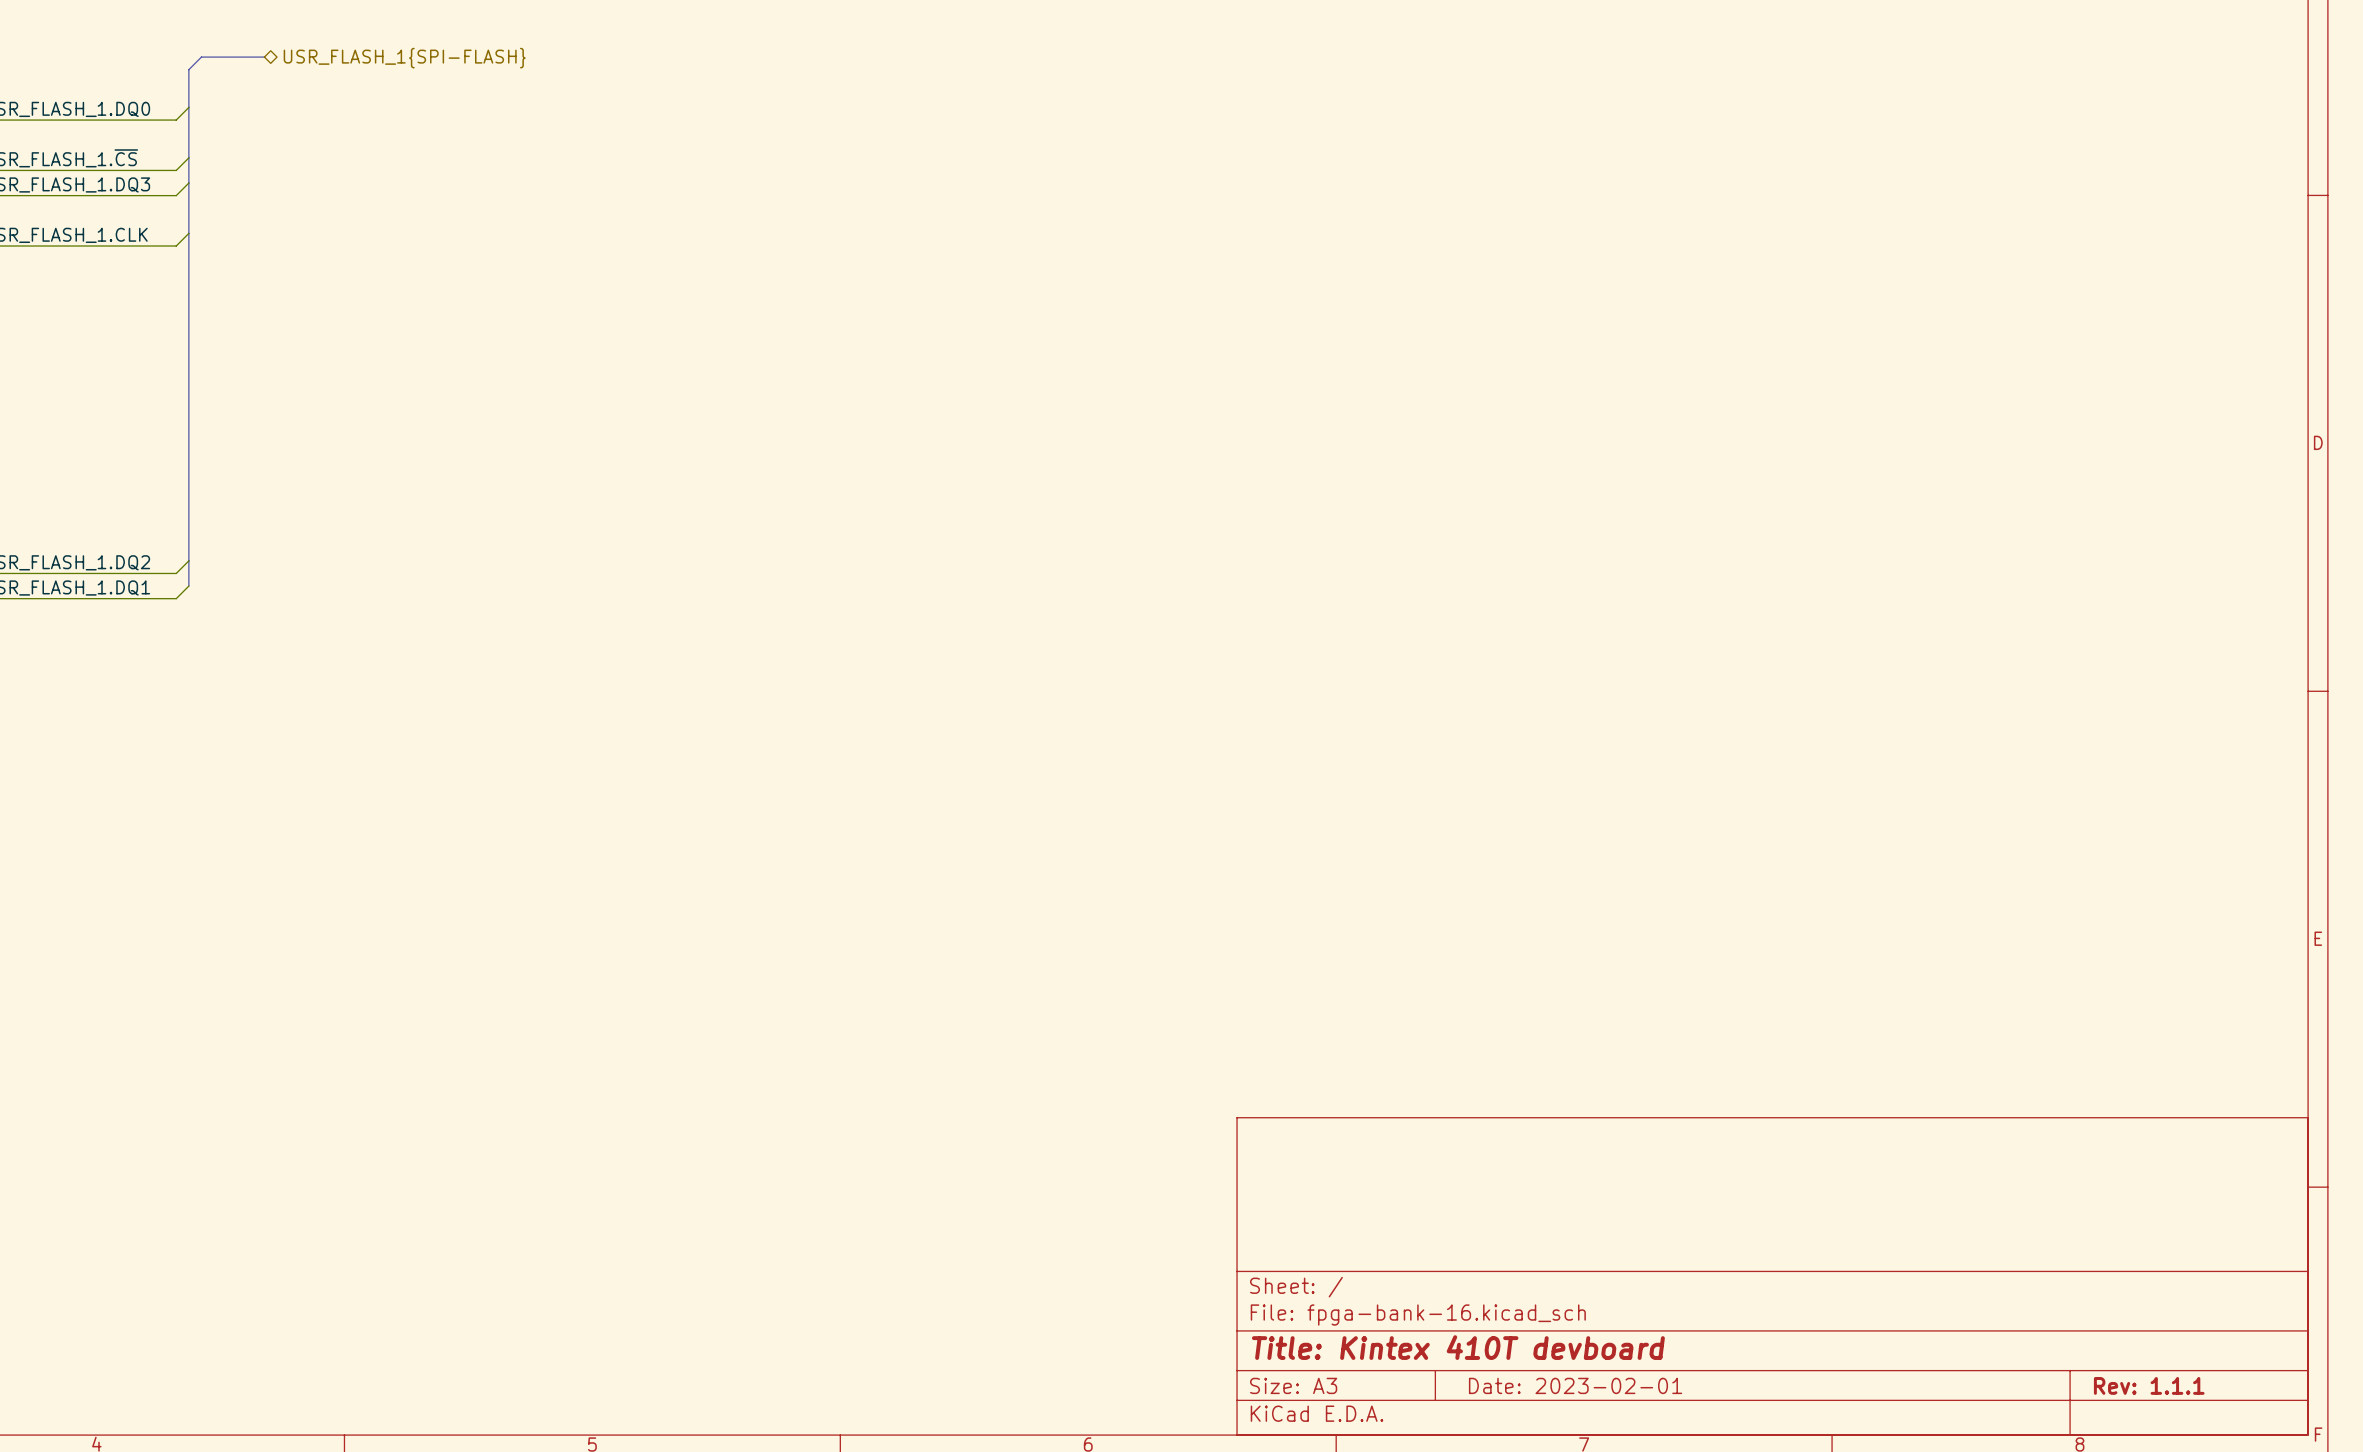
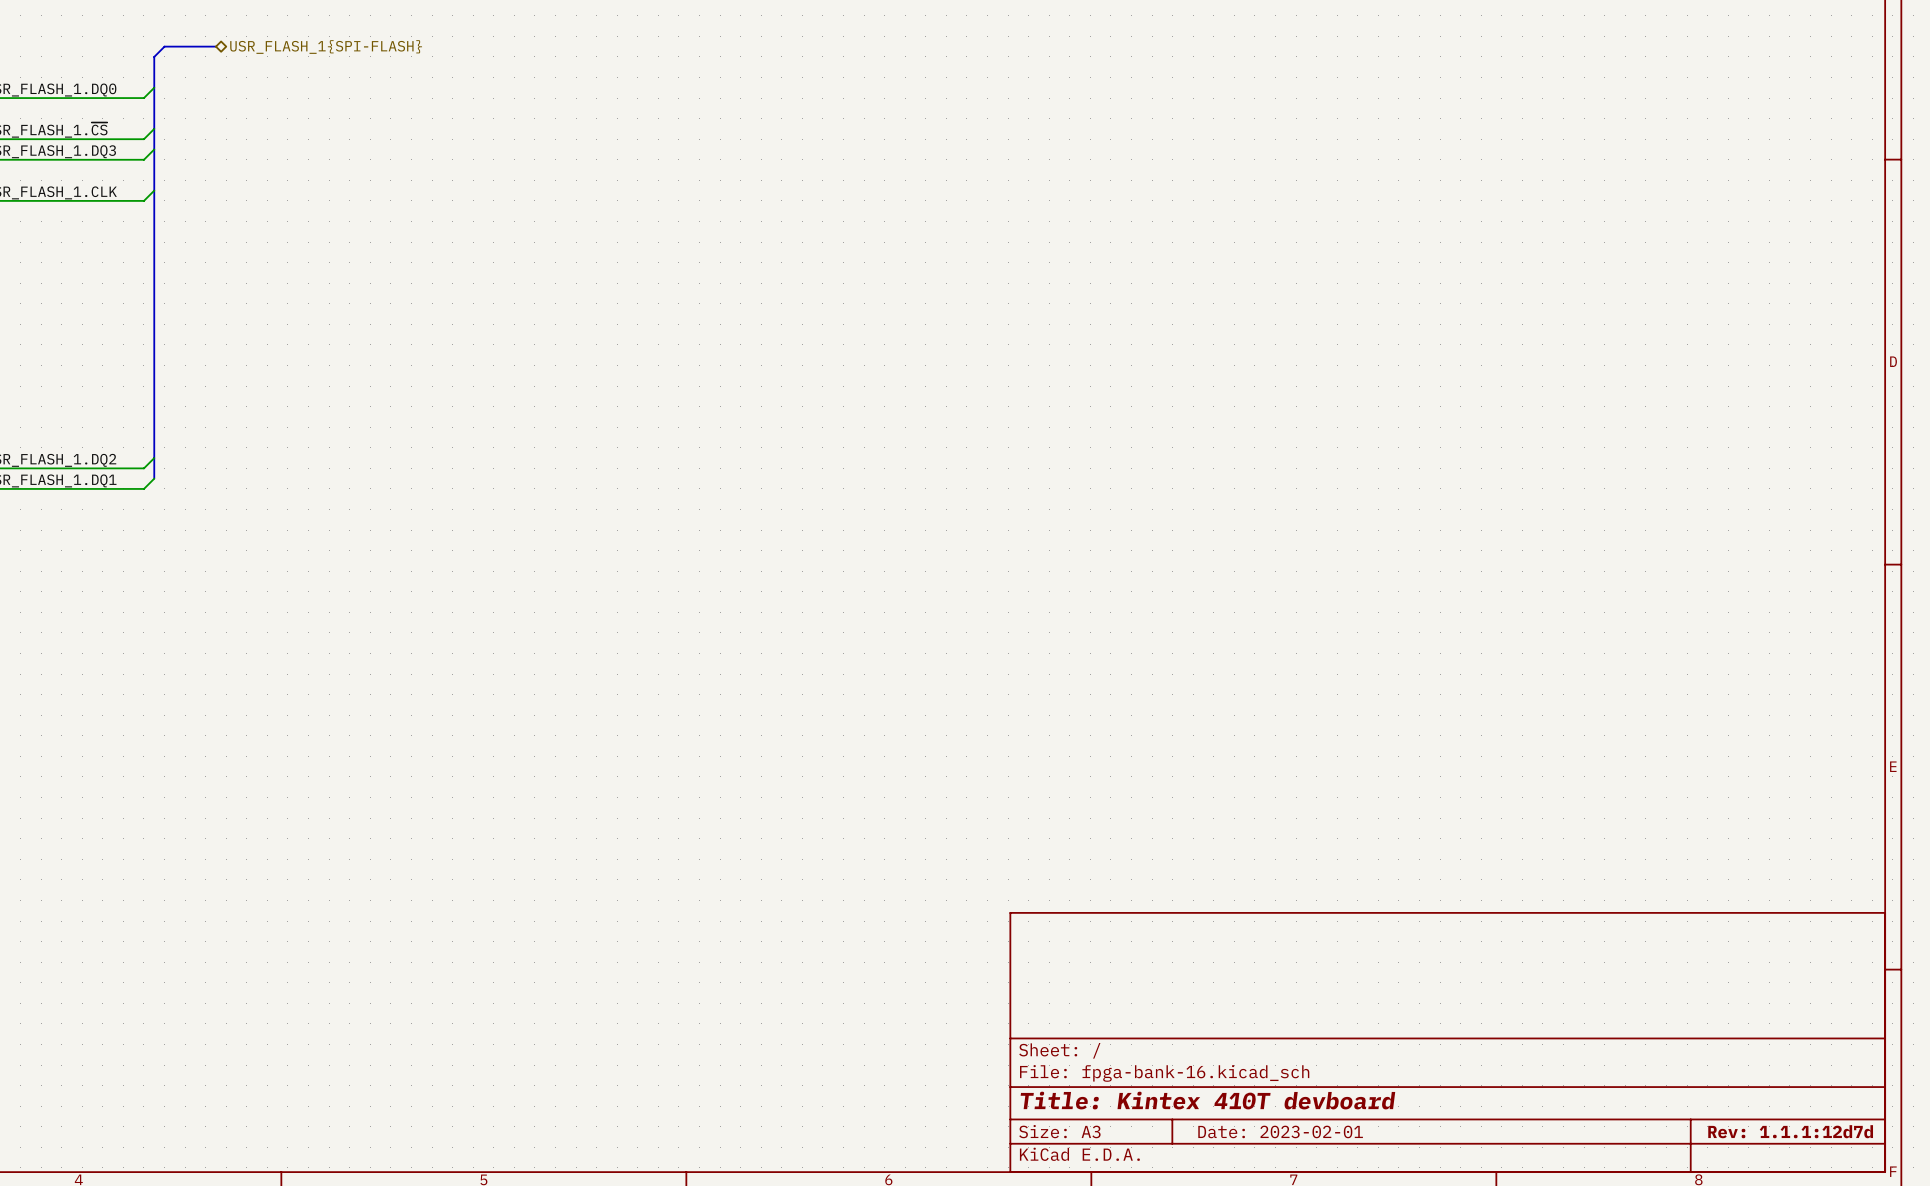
title block: Rev: 1.1.1 (2149, 1385) -> Rev: 1.1.1:12d7d (1790, 1131)

